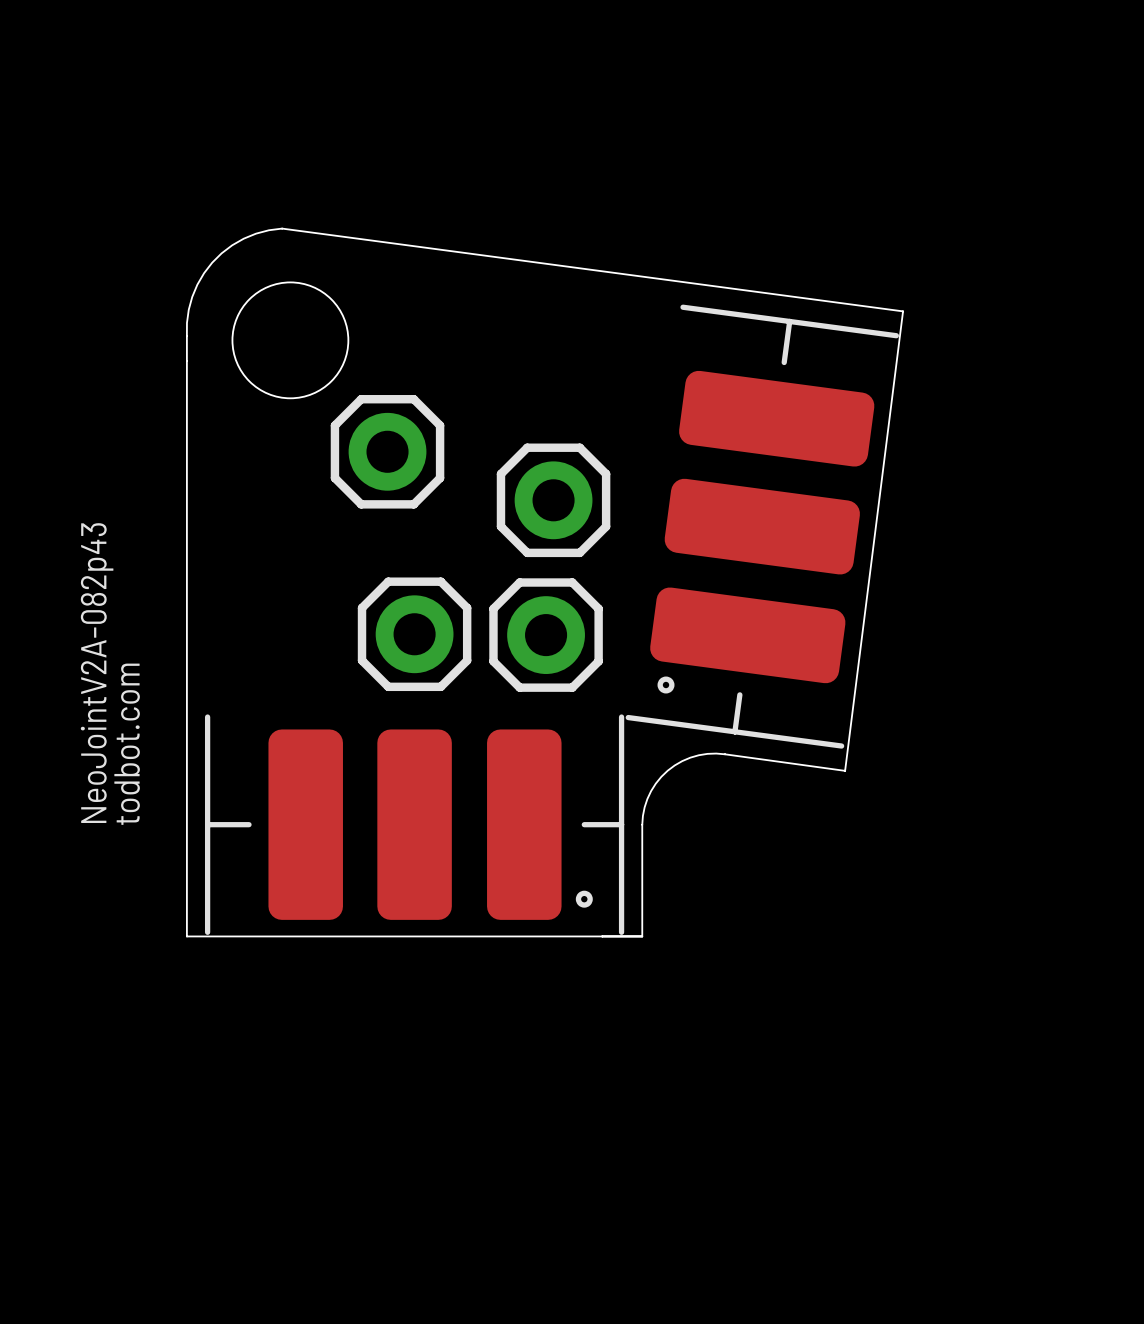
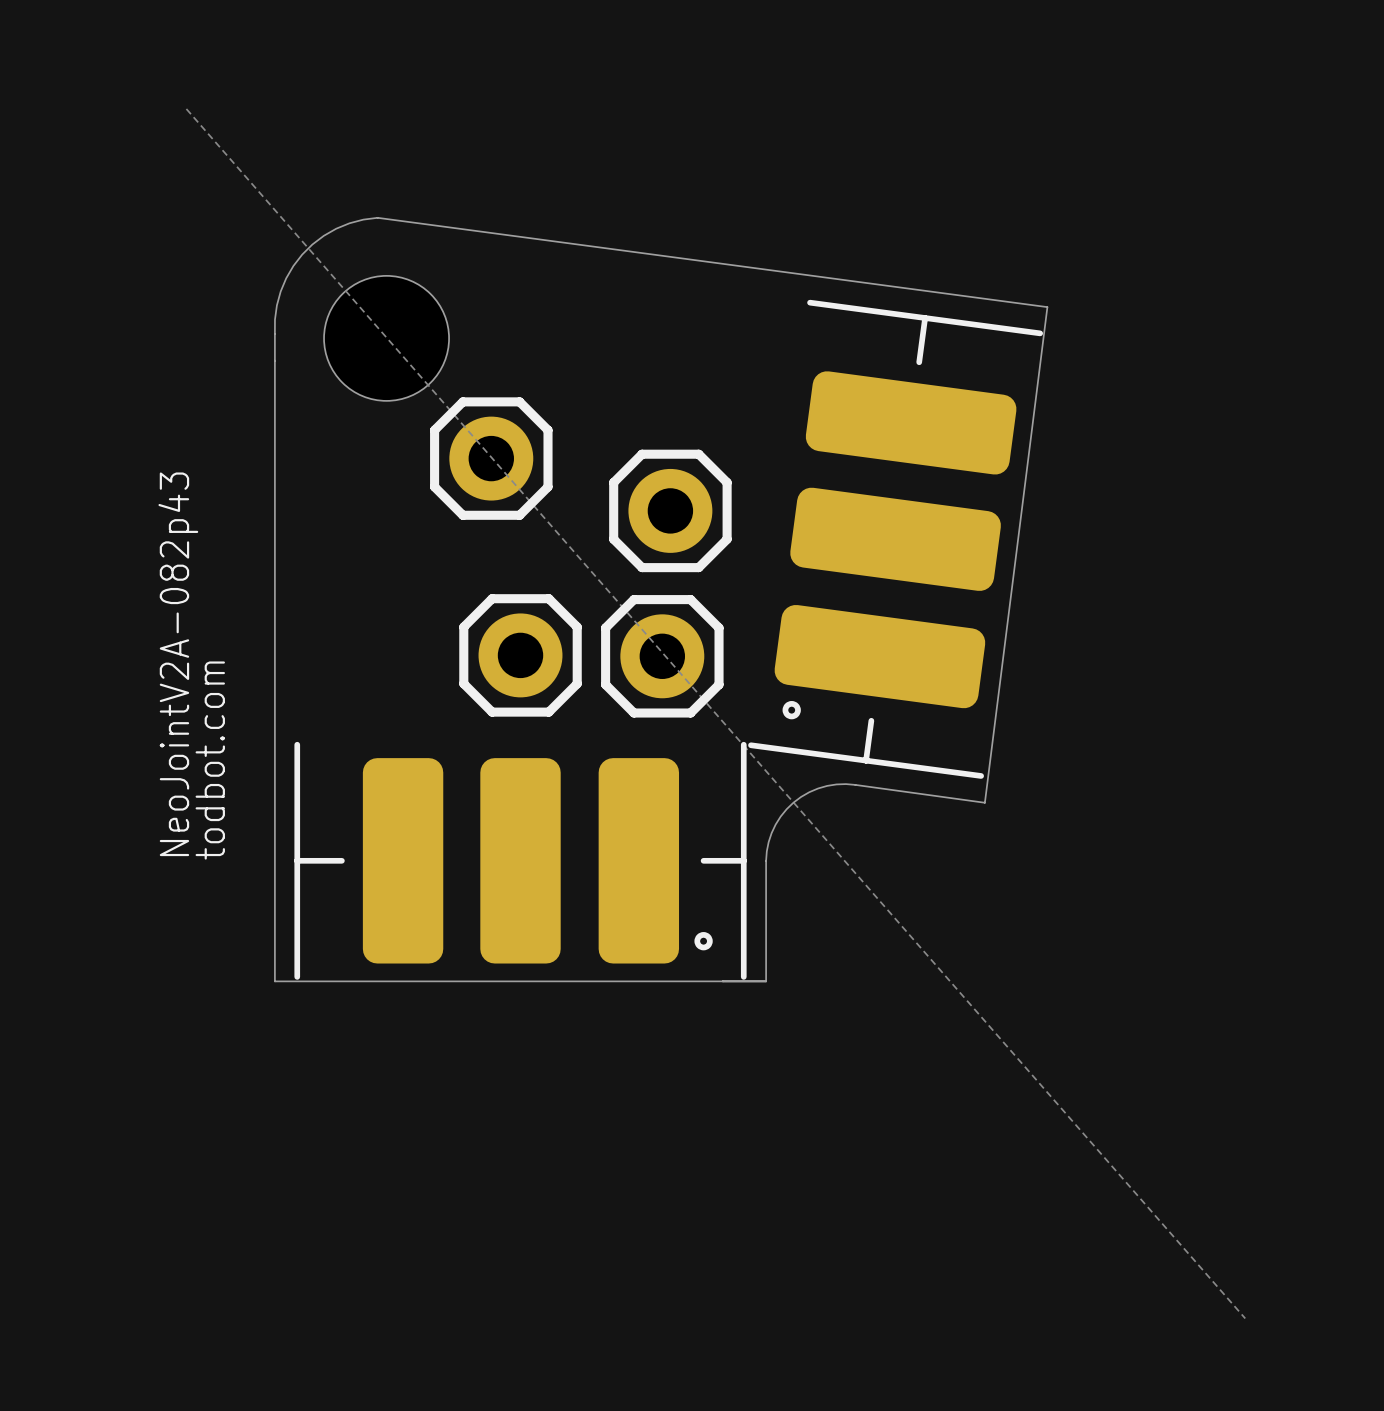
line: none -> (186, 108) (1245, 1318)

